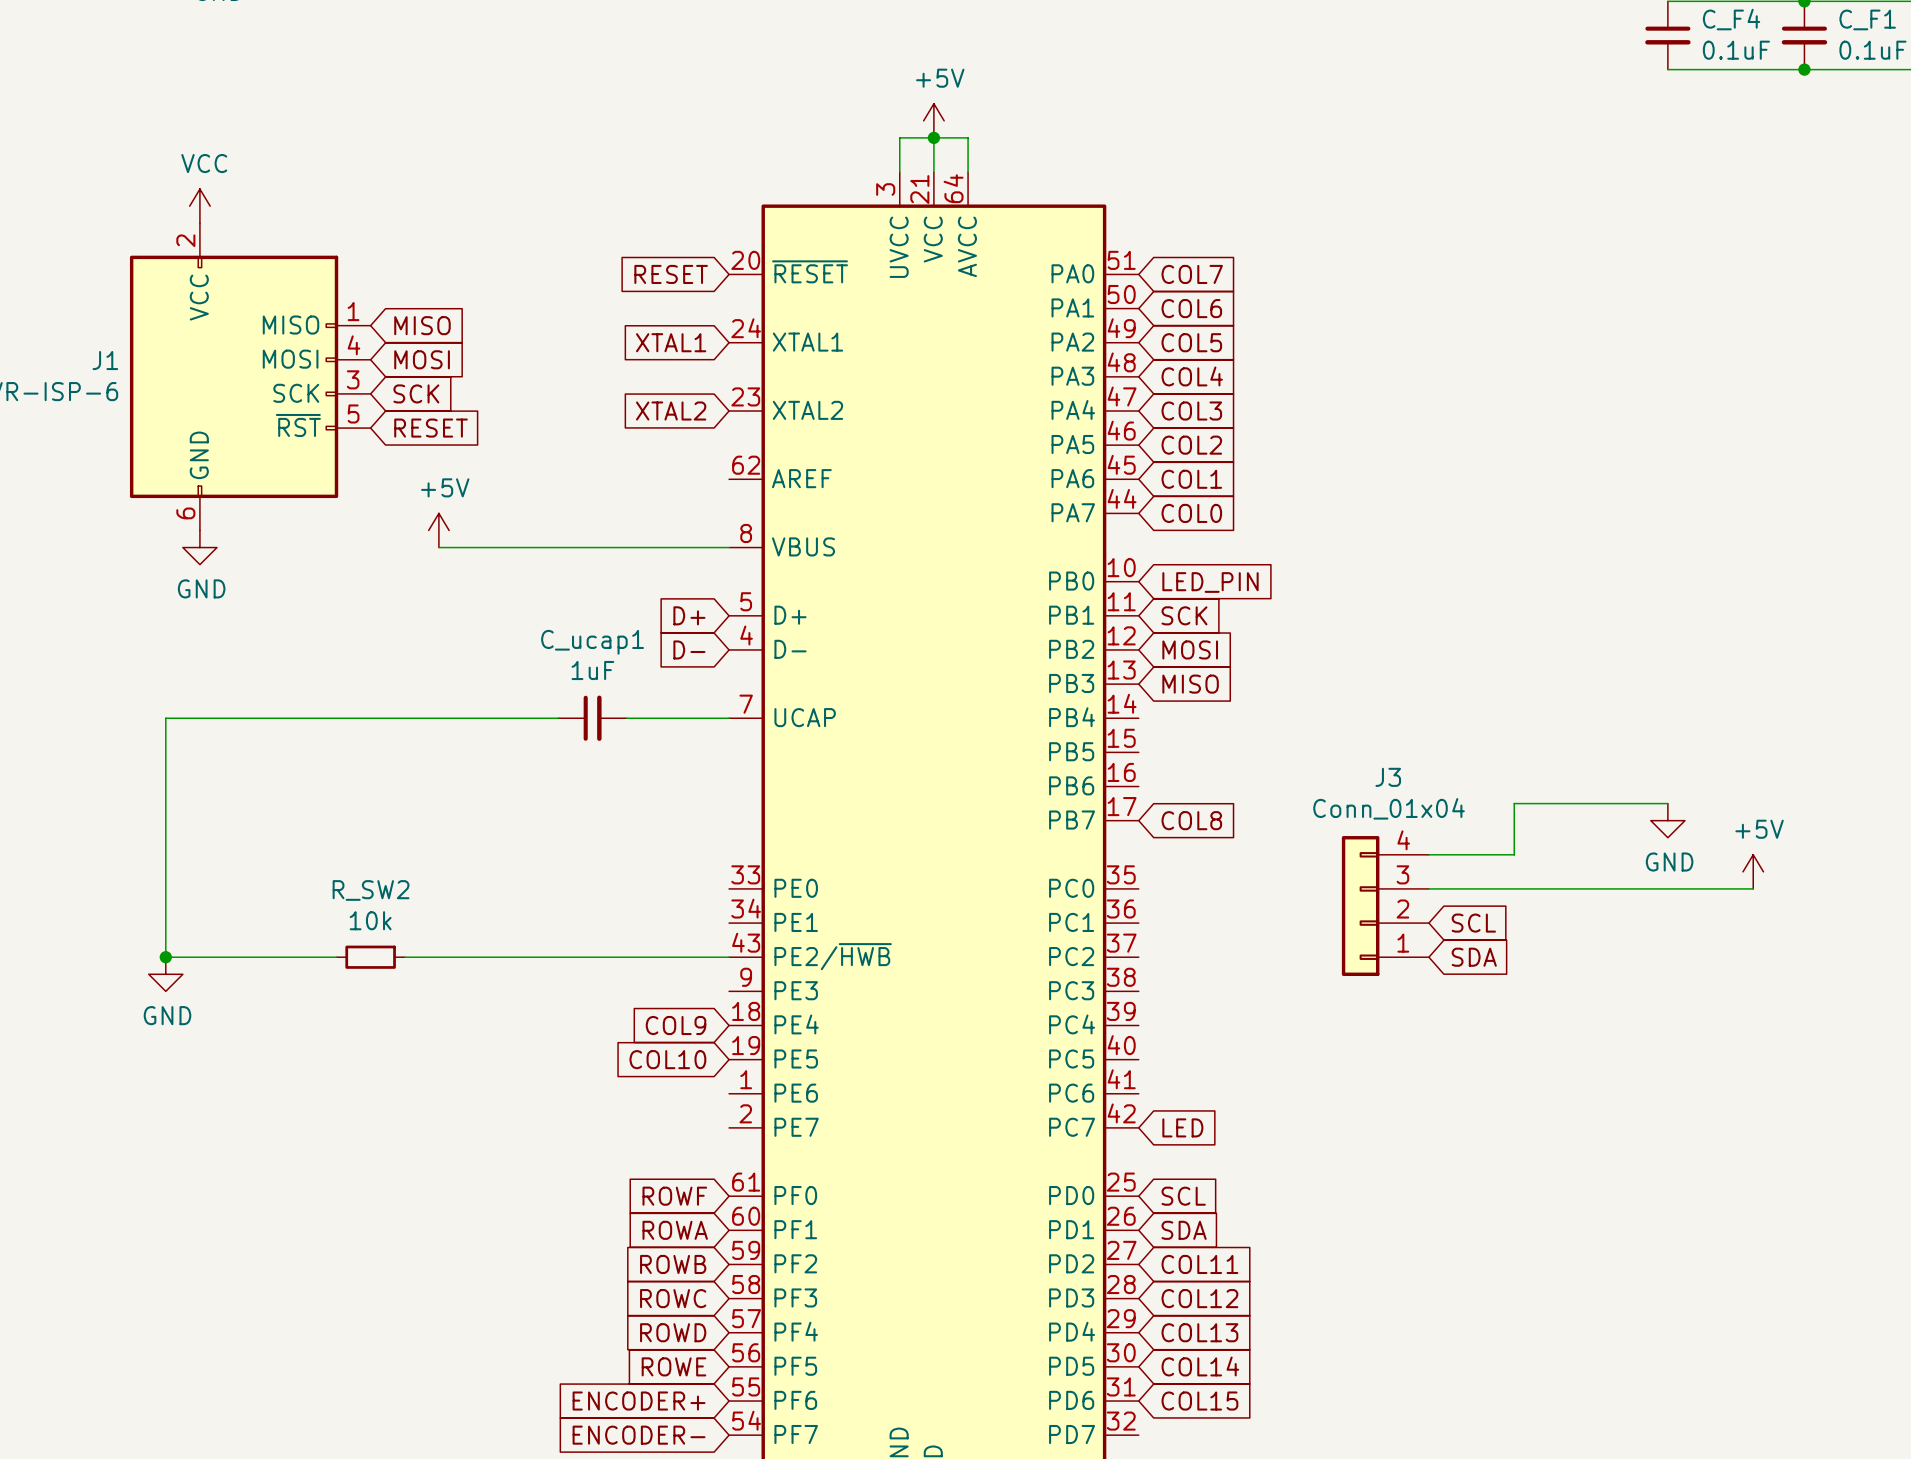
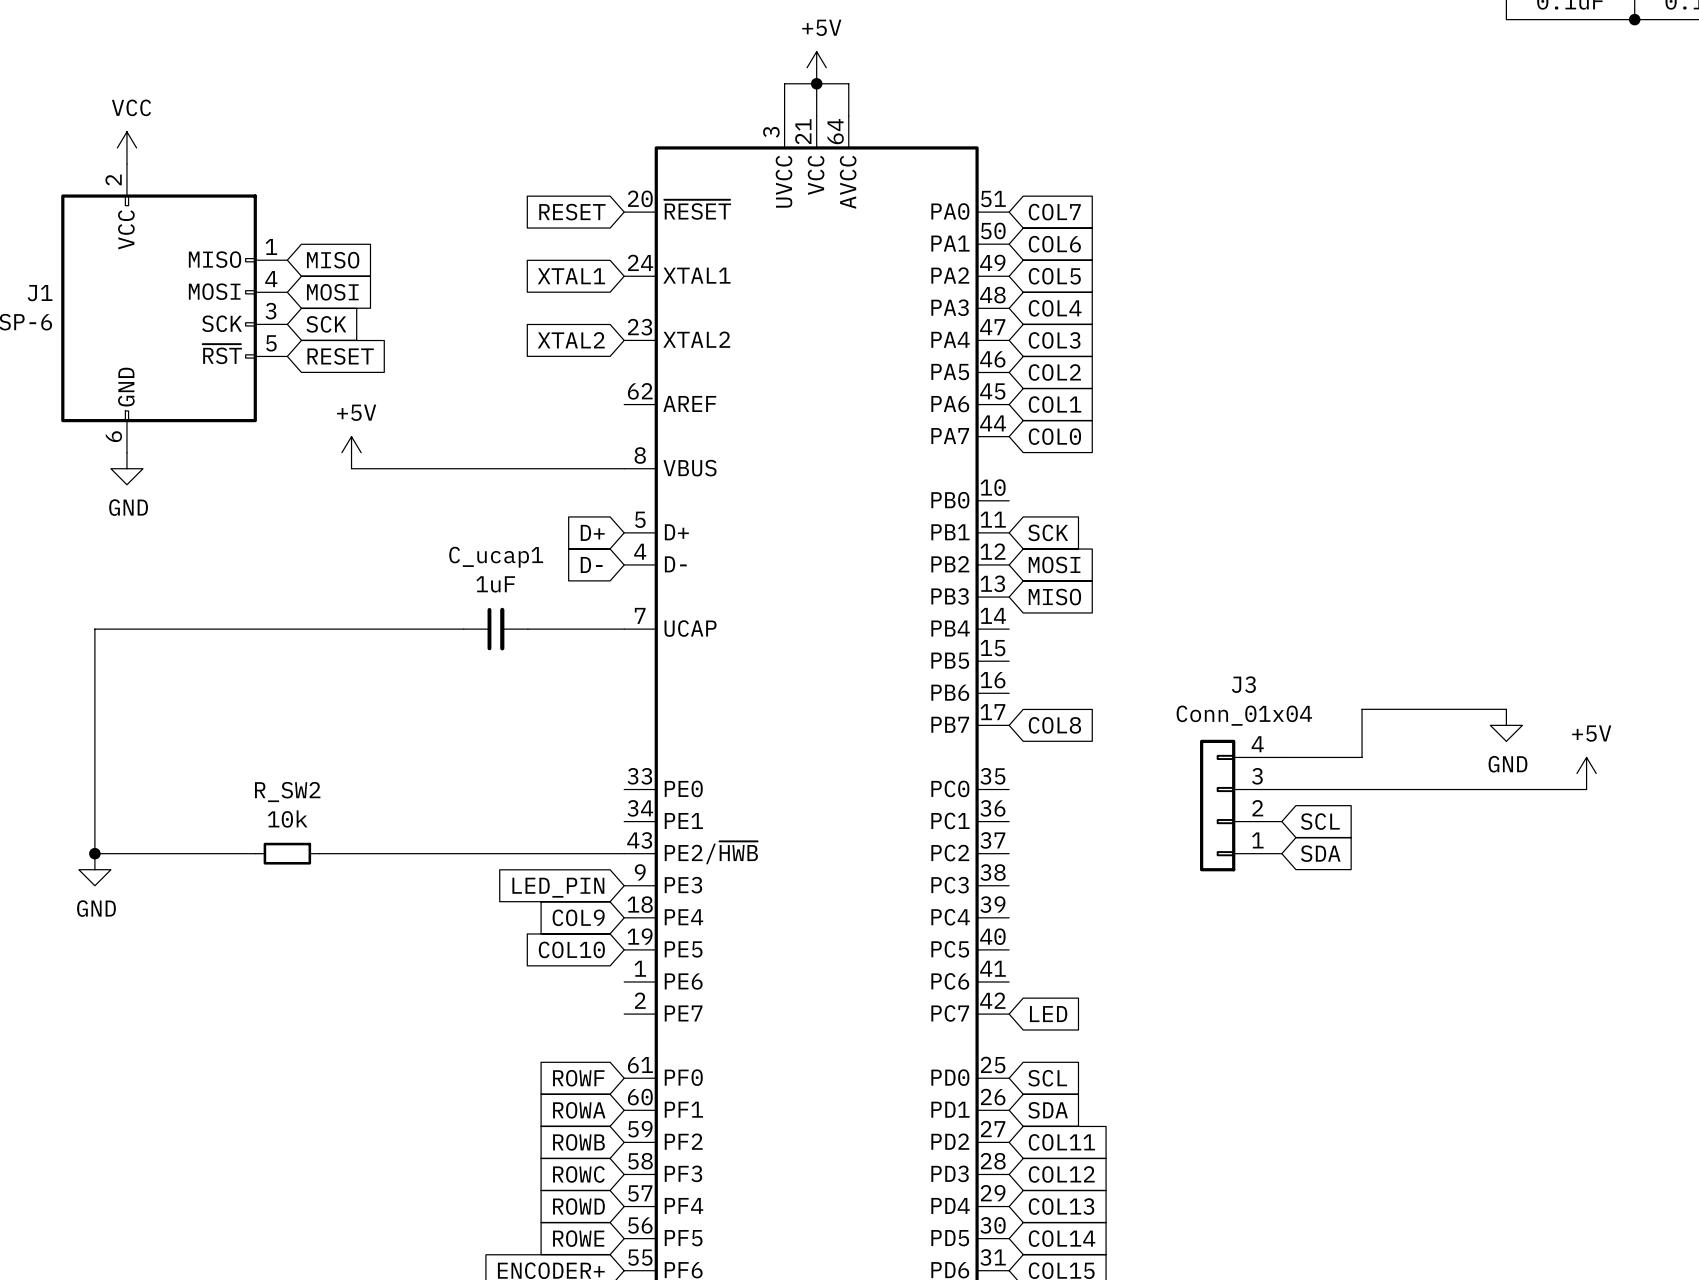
global label: LED_PIN (1210, 582) -> none
global label: none -> LED_PIN (558, 887)

